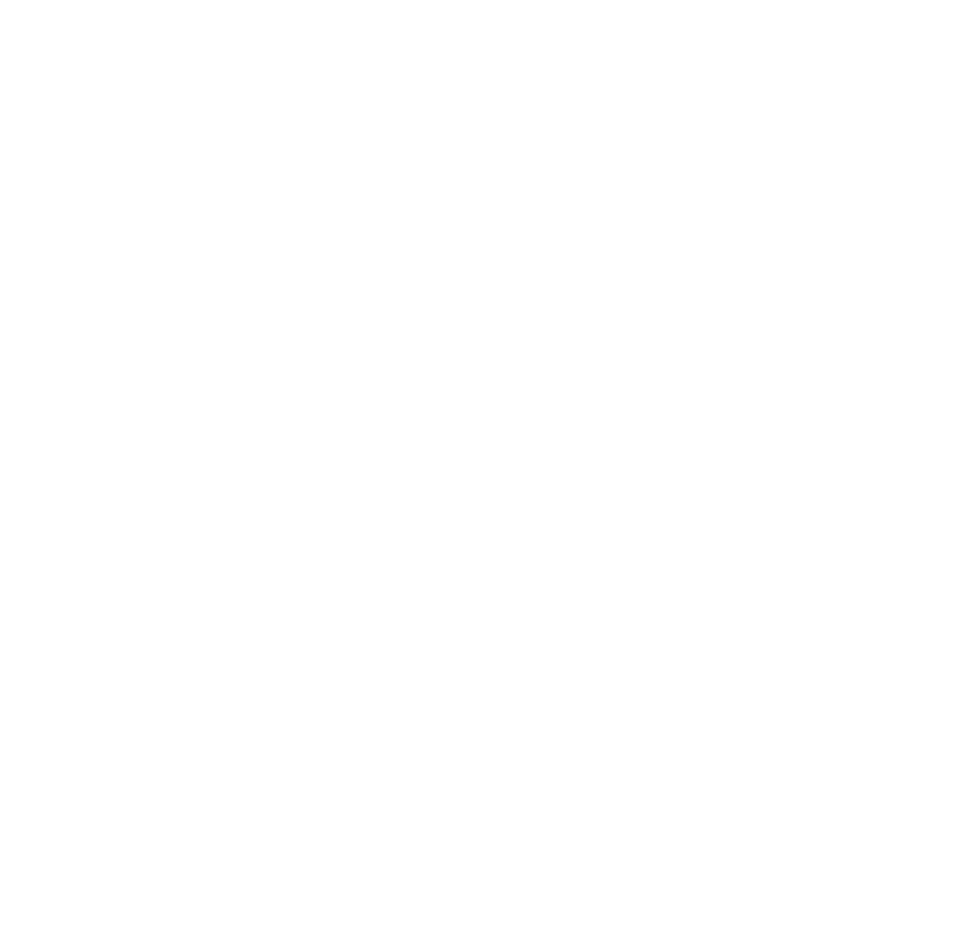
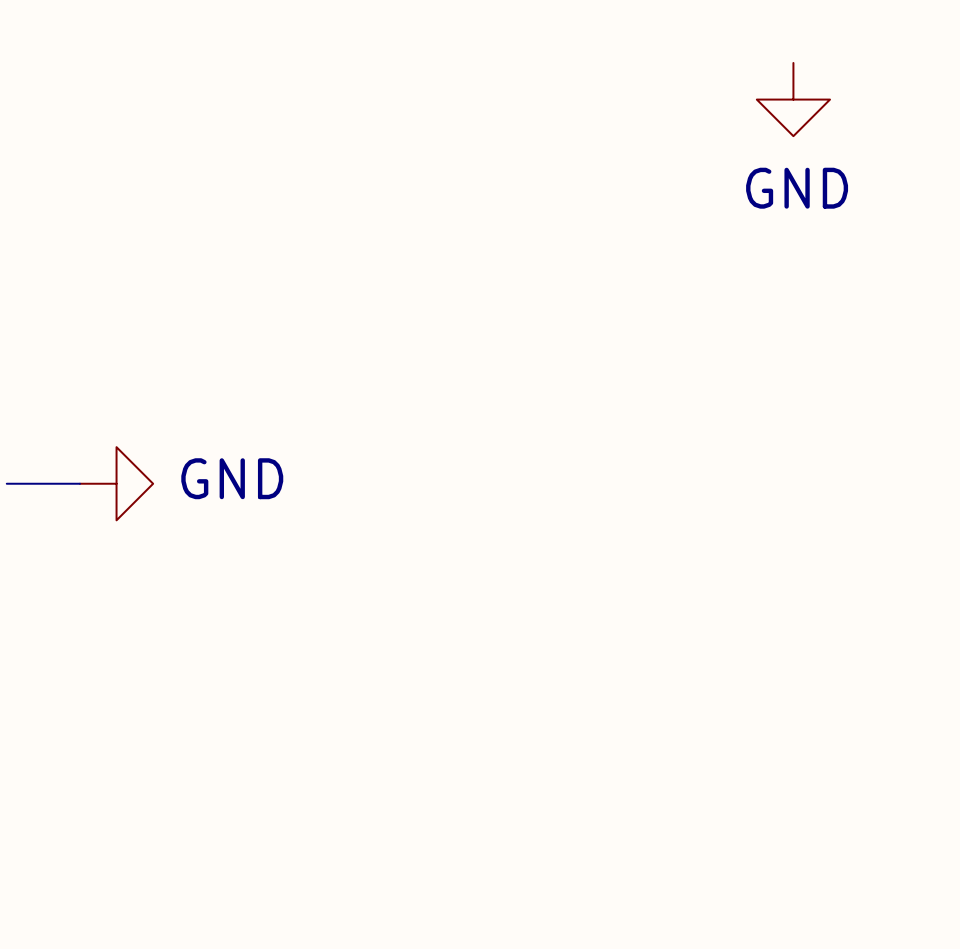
power symbol: none -> GND (793, 99)
wire: none -> (6, 483) (79, 483)
power symbol: none -> GND (116, 483)

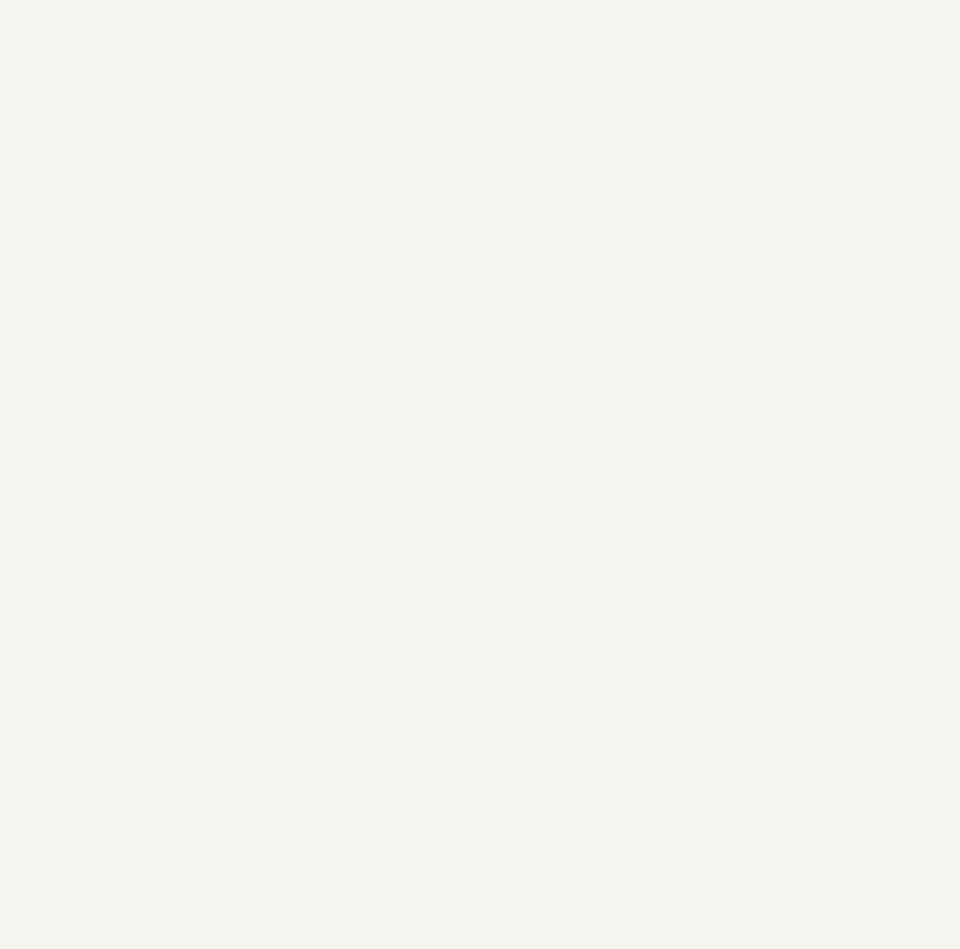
power symbol: GND (793, 99) -> none
wire: (6, 483) (79, 483) -> none
power symbol: GND (116, 483) -> none

